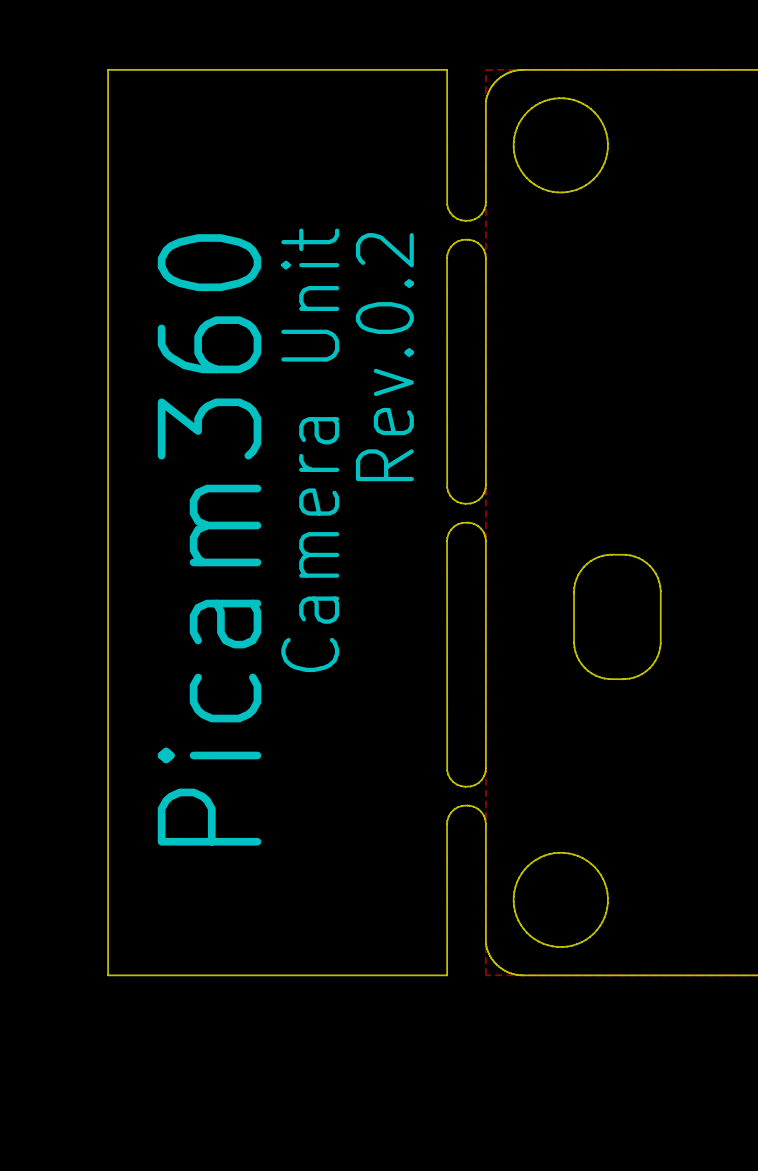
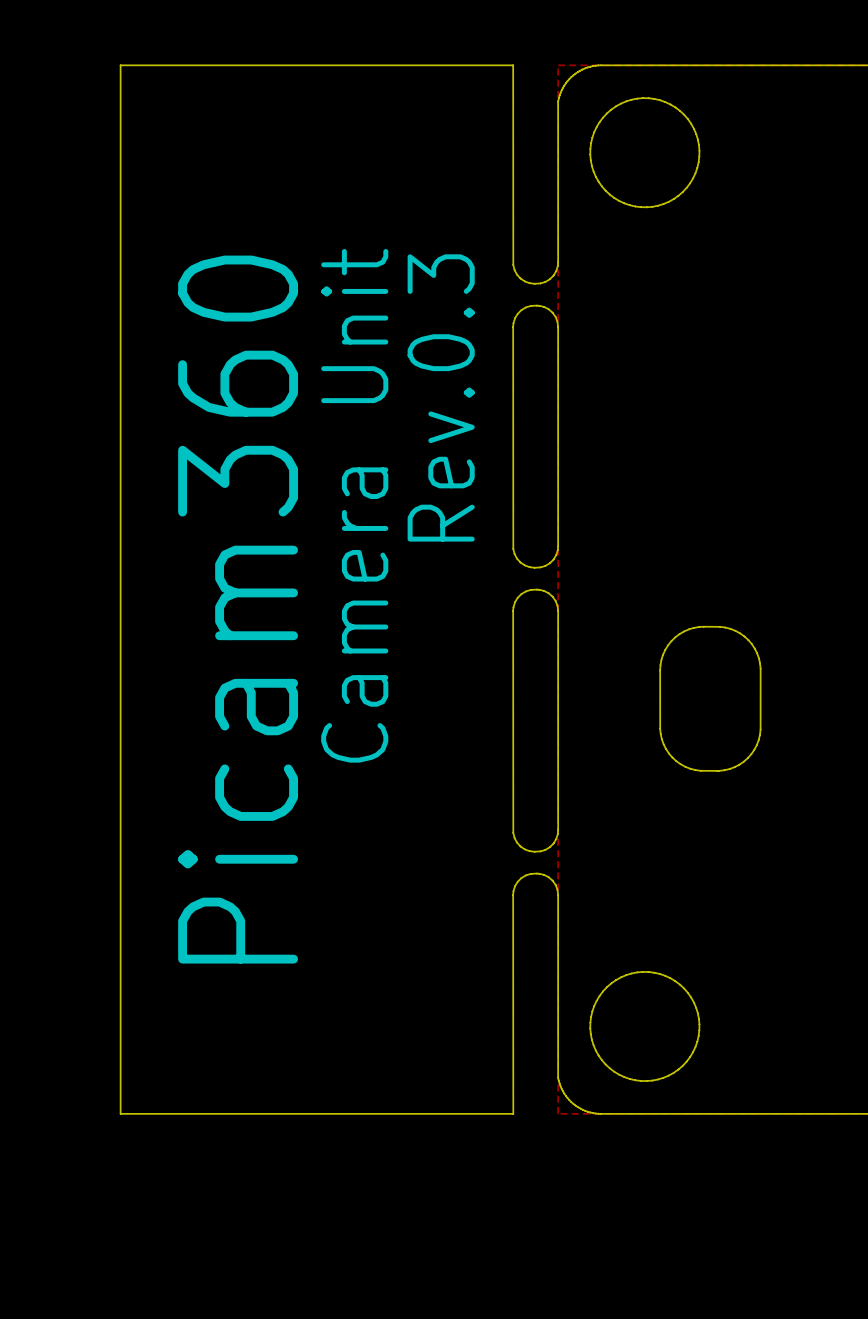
board edge: (485, 202) (481, 213) (470, 220) (461, 220) (453, 216) (447, 204) -> (558, 218) (557, 266) (549, 279) (540, 283) (524, 281) (514, 270) (513, 221)
board edge: (447, 295) (448, 250) (458, 241) (467, 239) (477, 242) (485, 253) (485, 295) -> (513, 327) (515, 318) (521, 310) (536, 305) (544, 306) (552, 312) (558, 327)
text: Rev.0.2 (384, 357) -> Rev.0.3 (441, 397)
board edge: (485, 730) (485, 771) (478, 782) (470, 786) (457, 784) (448, 774) (447, 732) -> (558, 830) (553, 843) (540, 851) (529, 851) (520, 846) (513, 832)
board edge: (447, 824) (448, 816) (454, 809) (467, 805) (473, 806) (481, 811) (485, 824) -> (513, 938) (513, 894) (515, 886) (525, 875) (536, 873) (548, 877) (557, 889) (558, 938)

